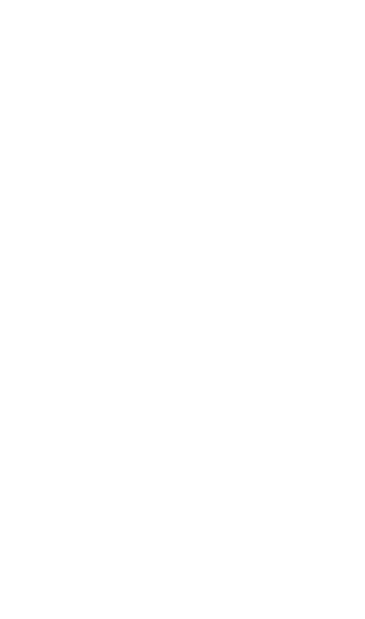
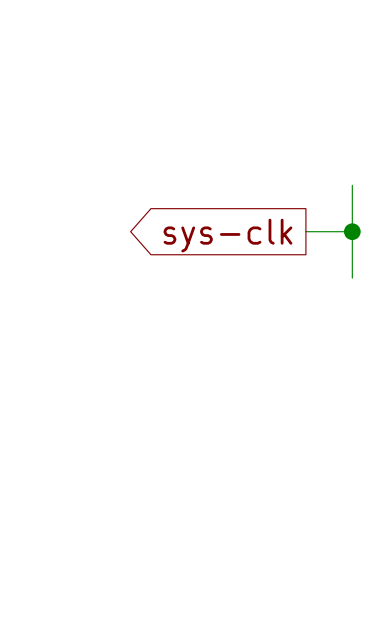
wire: none -> (352, 185) (352, 278)
wire: none -> (305, 231) (352, 231)
junction: none -> (352, 231)
global label: none -> sys-clk (227, 235)

